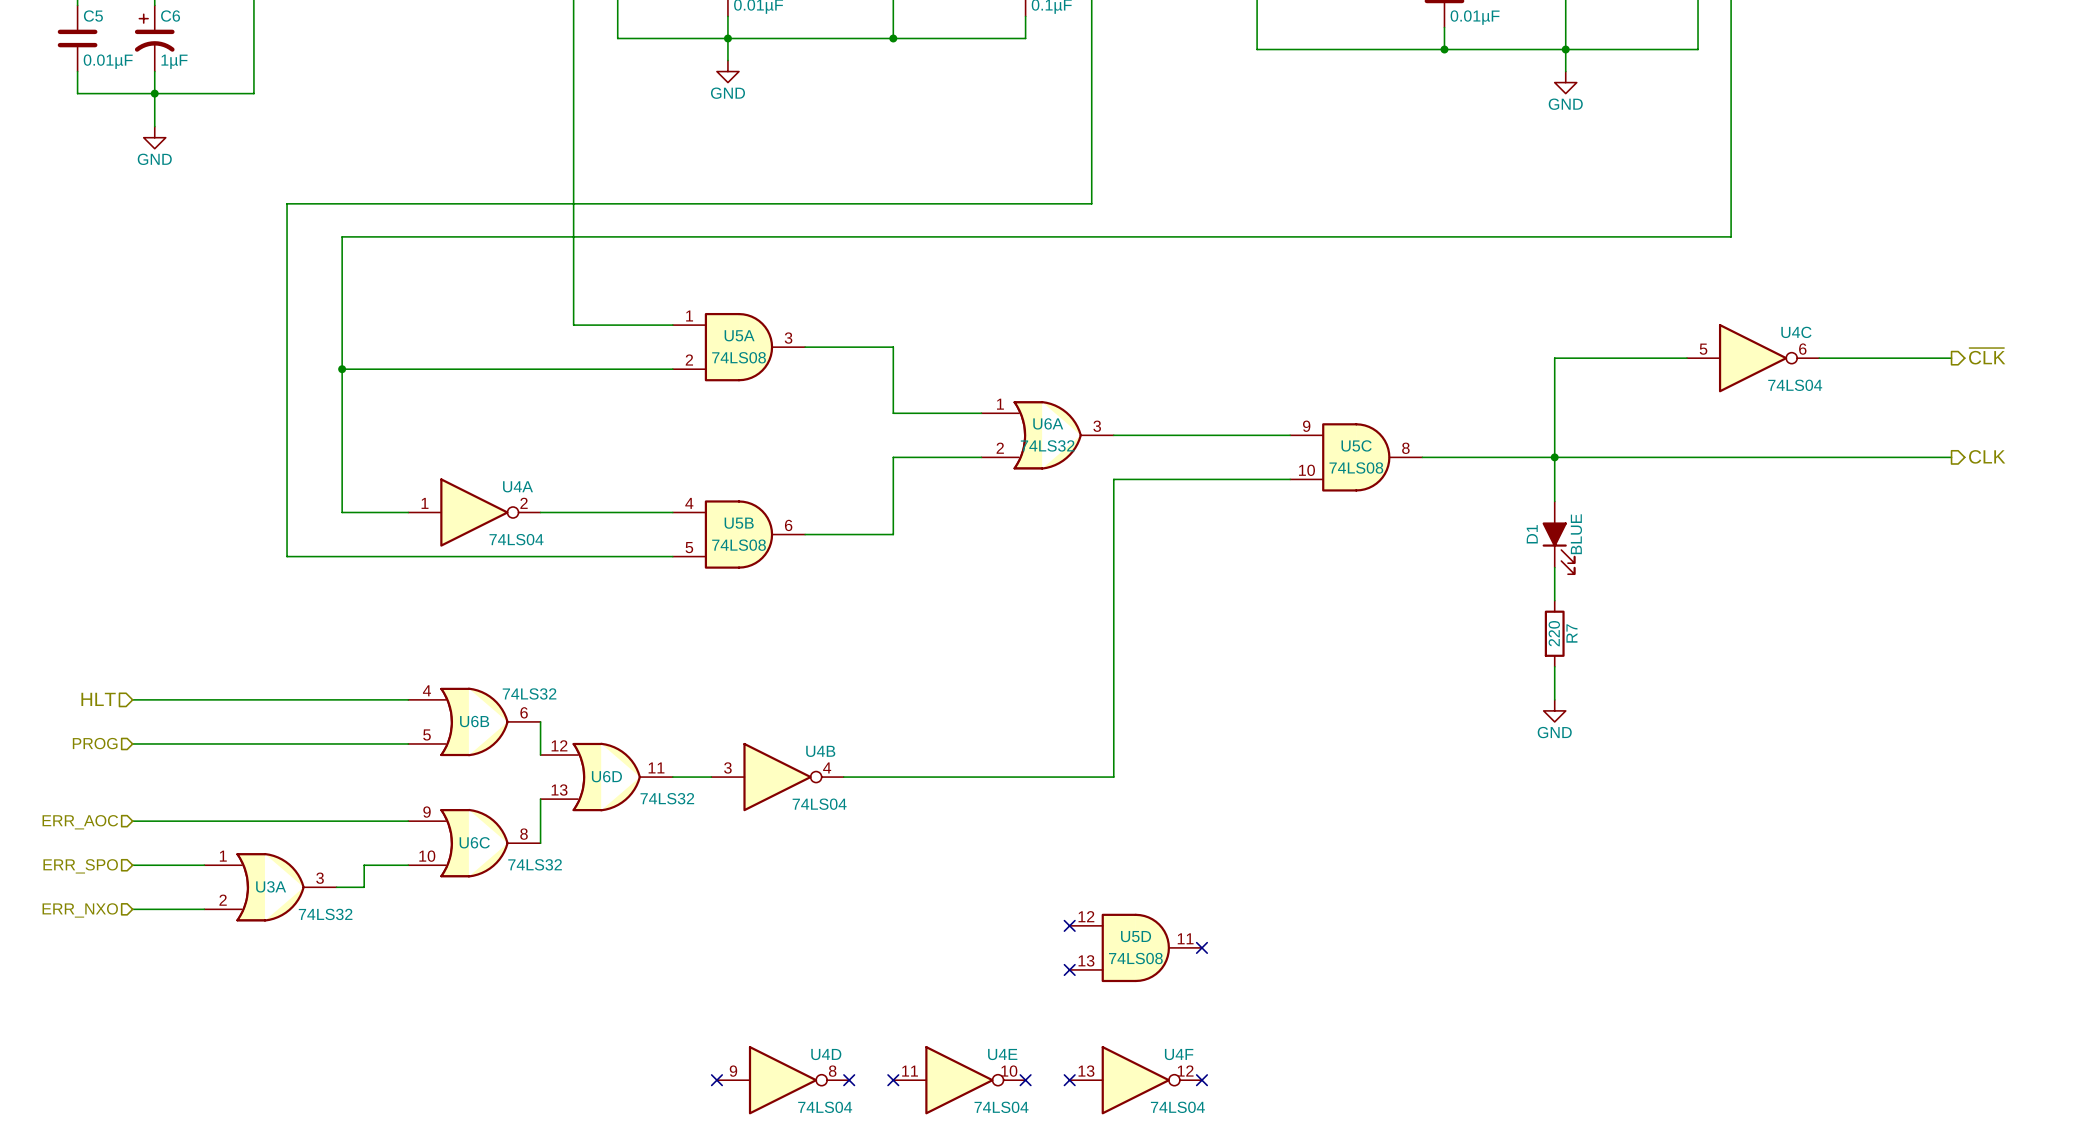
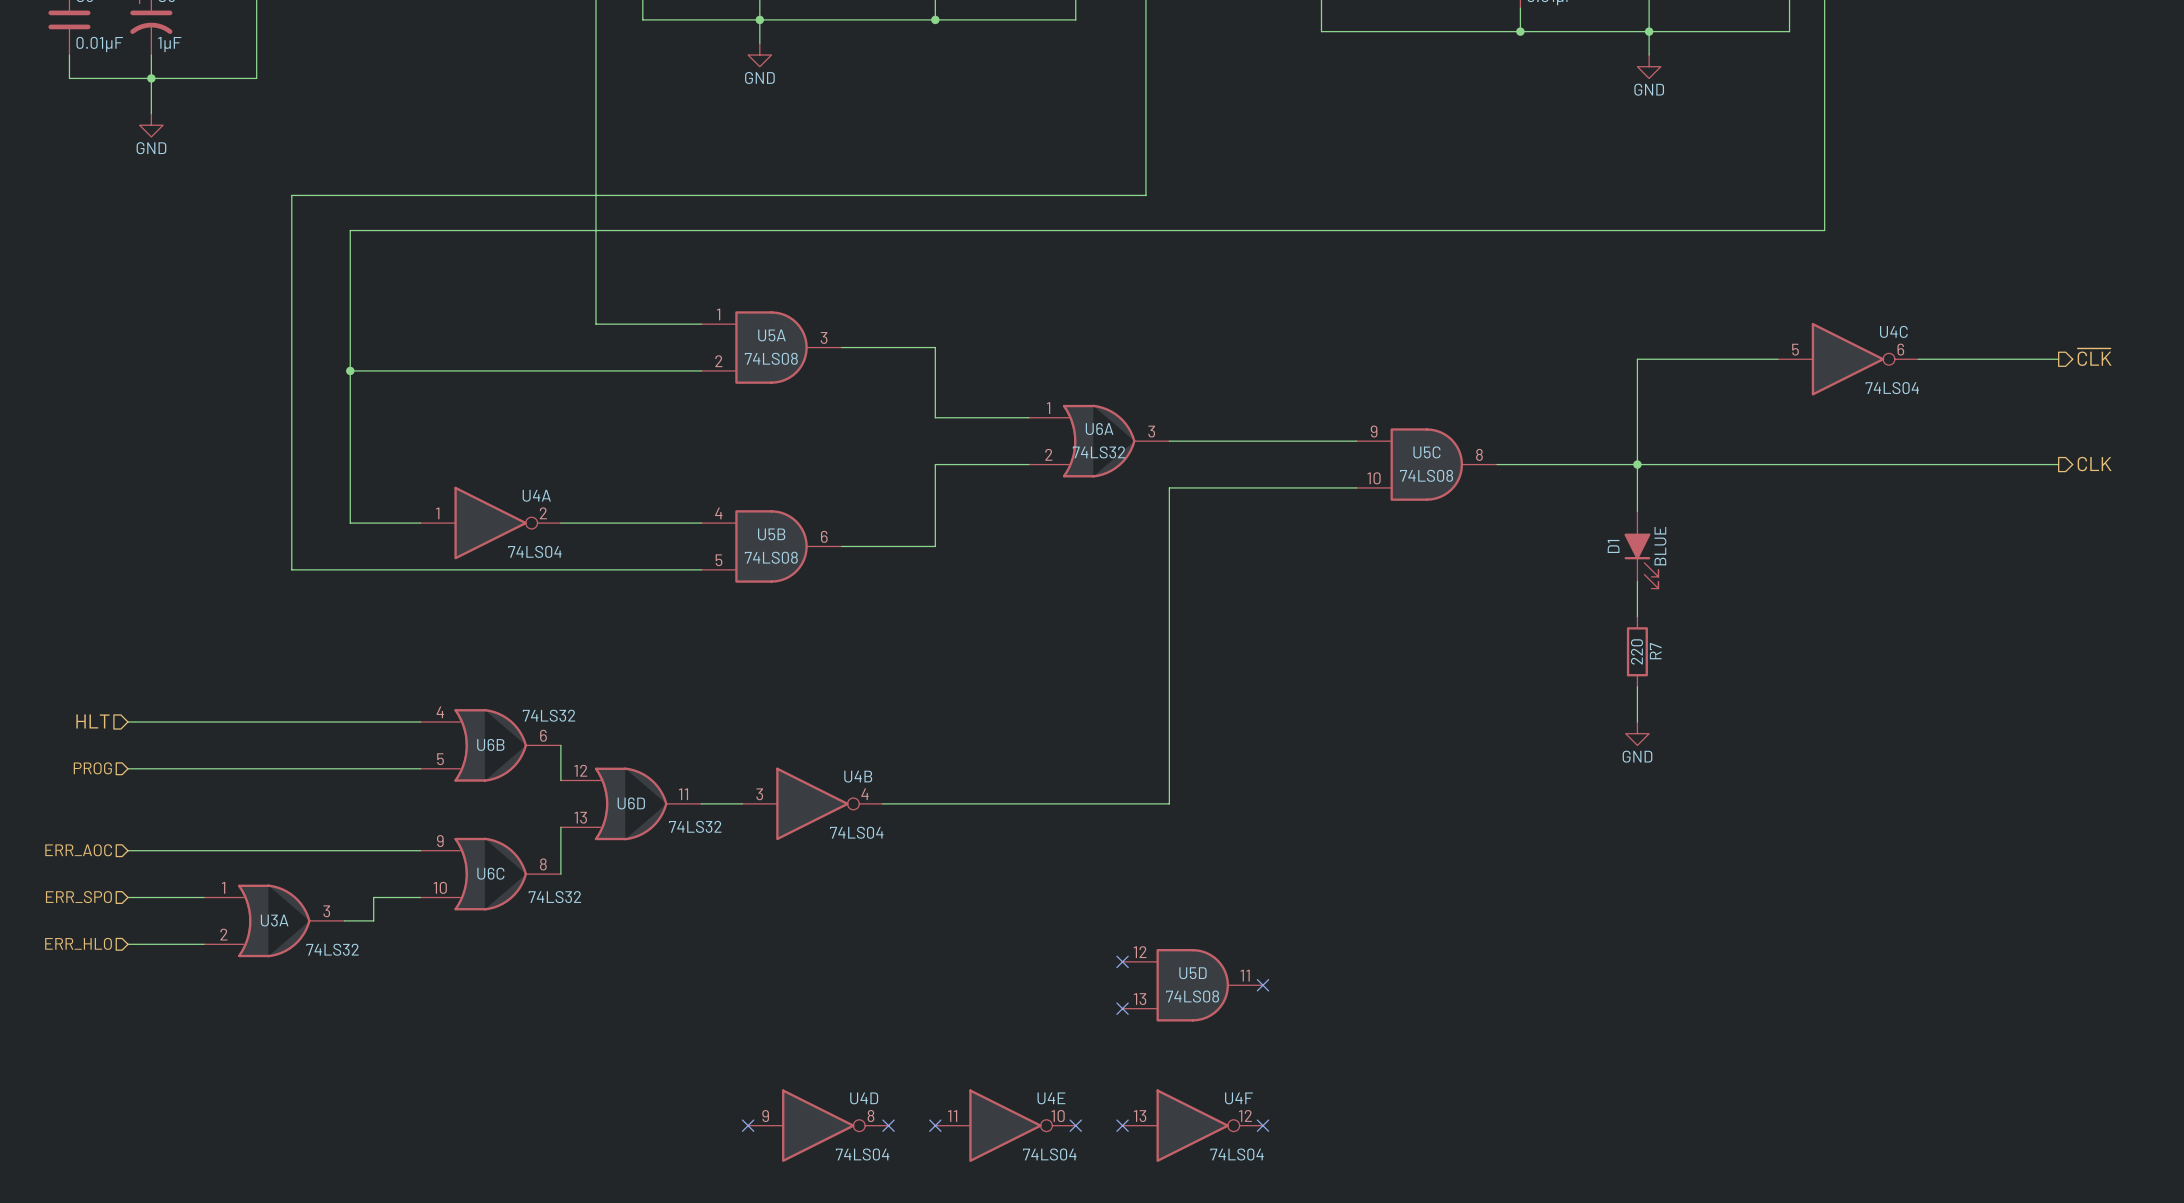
hierarchical label: ERR_NXO (80, 910) -> ERR_HLO (78, 943)

